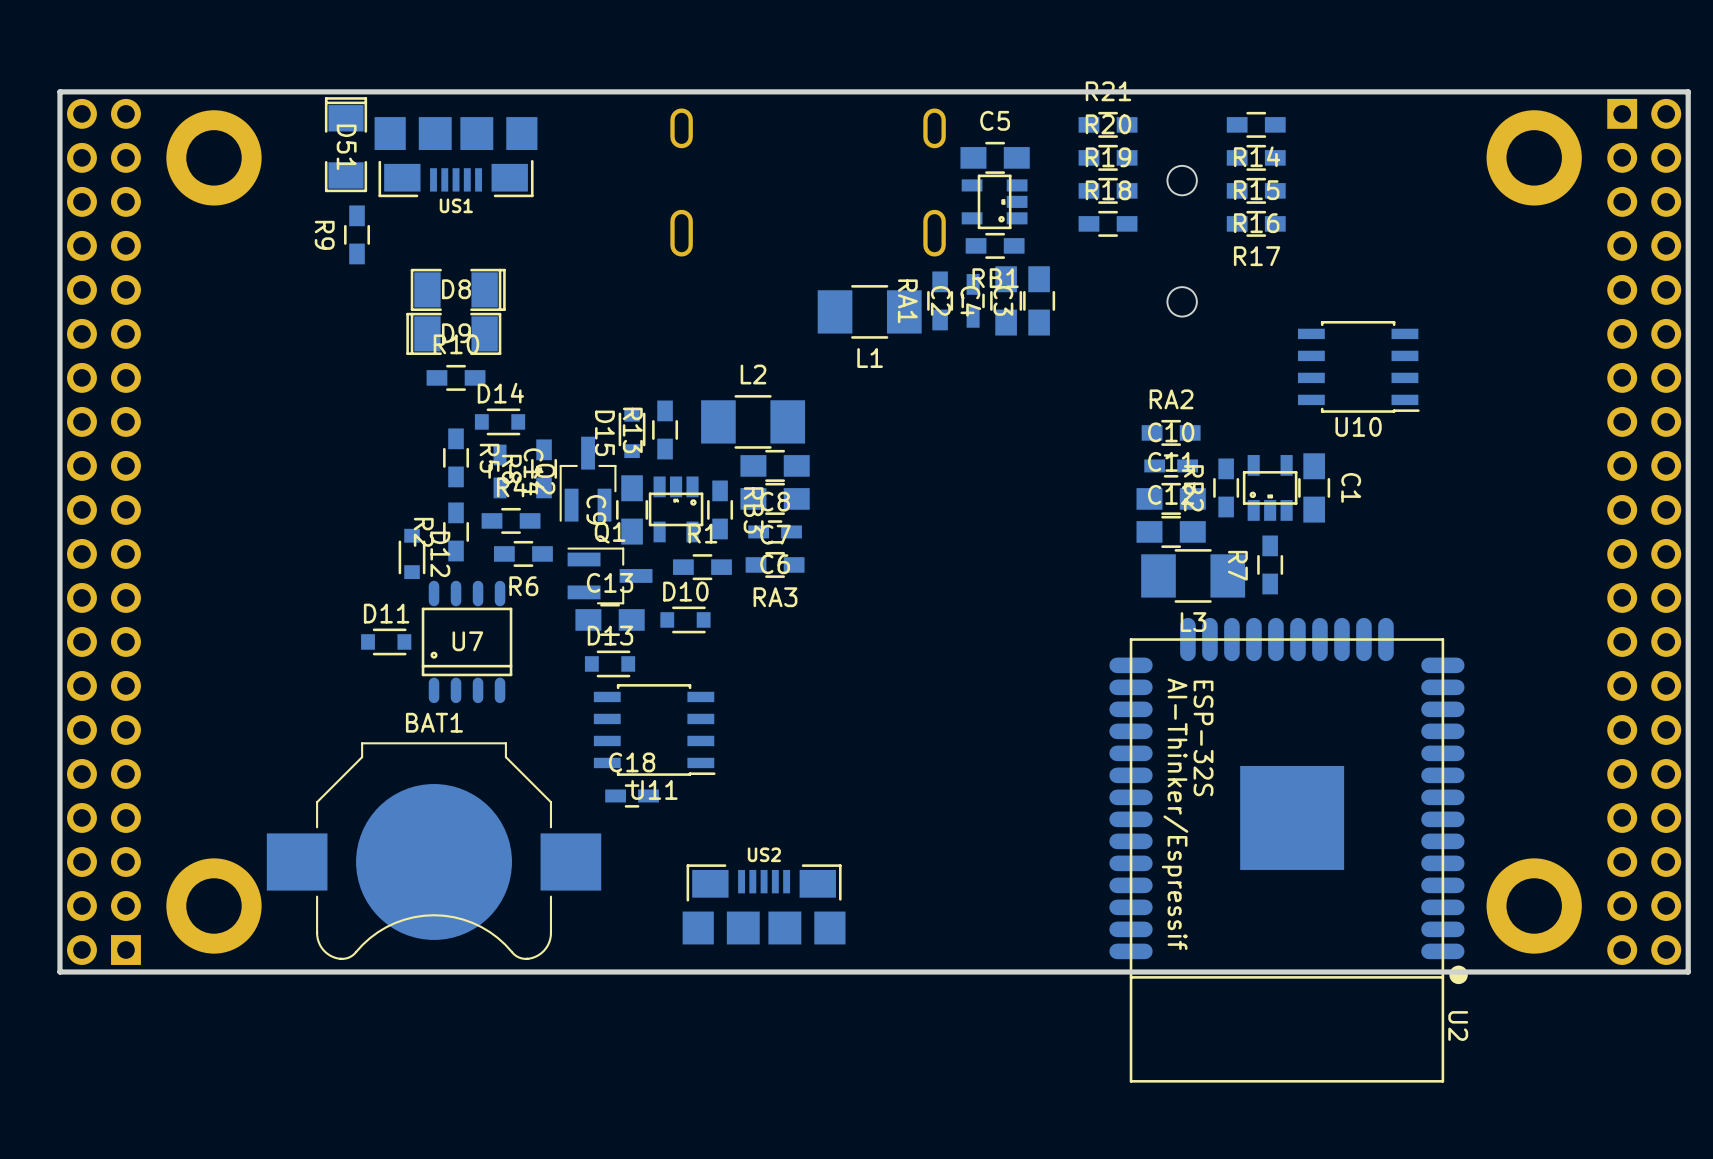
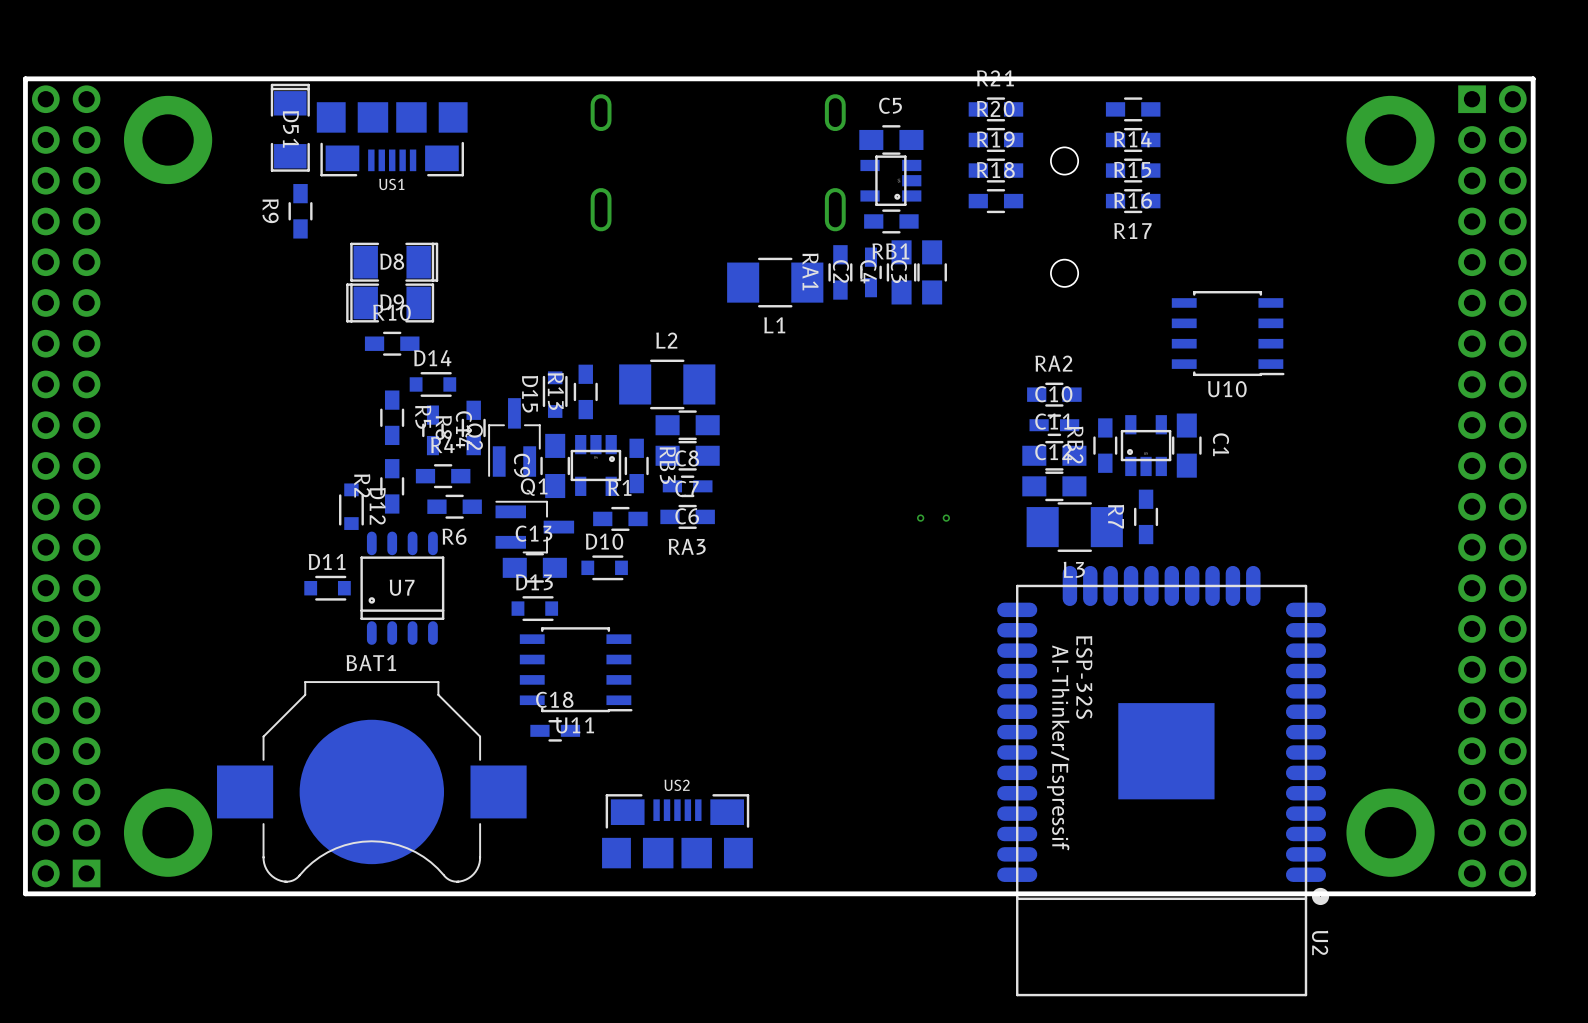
via: none -> (920, 518)
via: none -> (946, 518)

